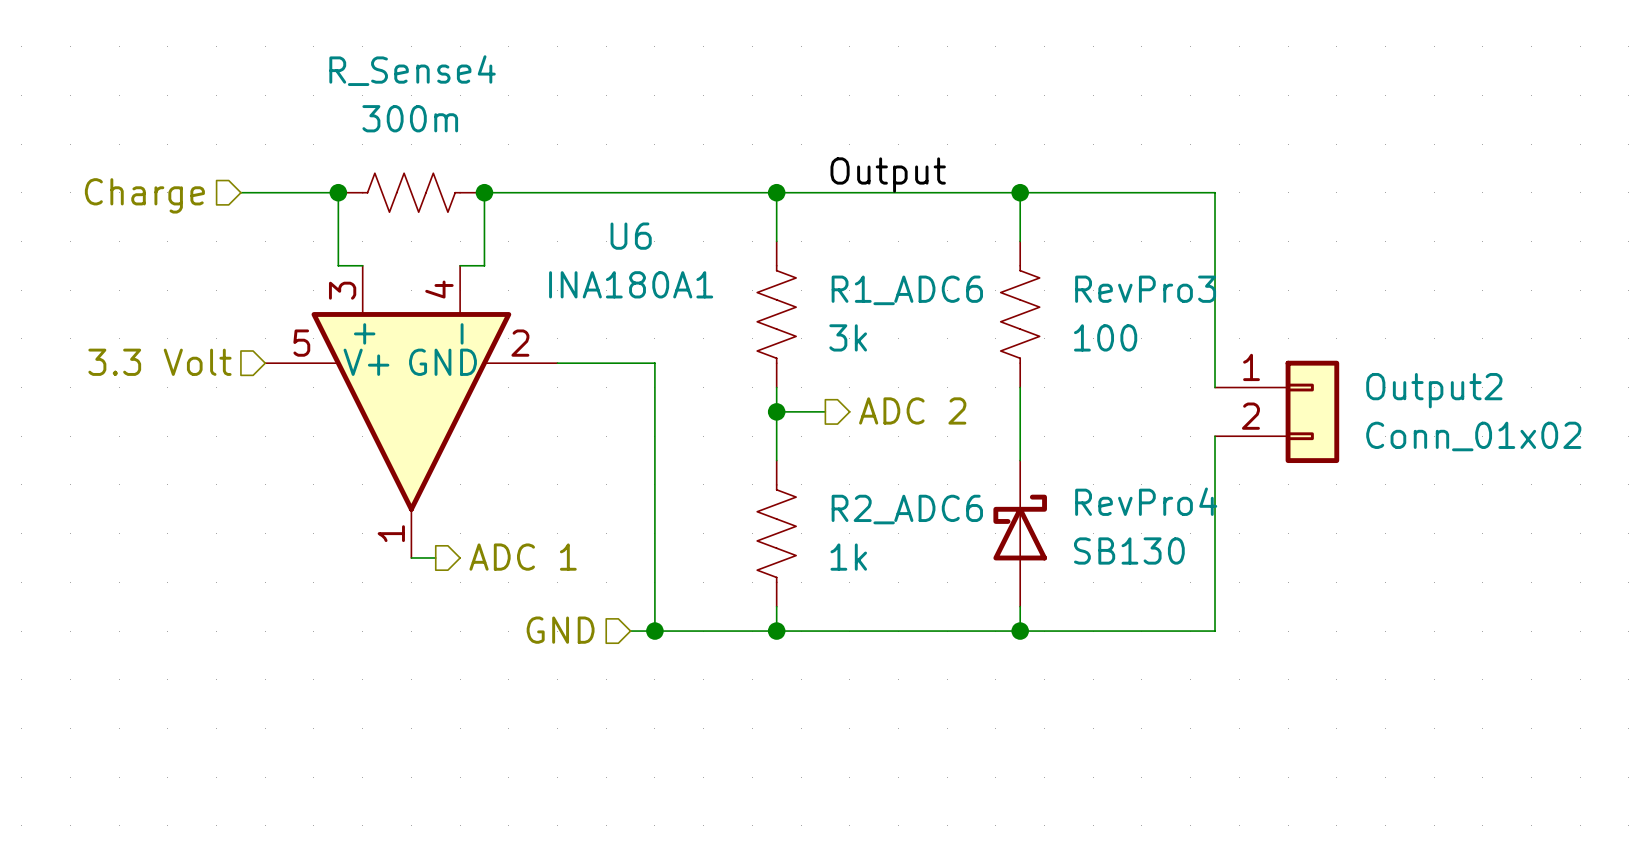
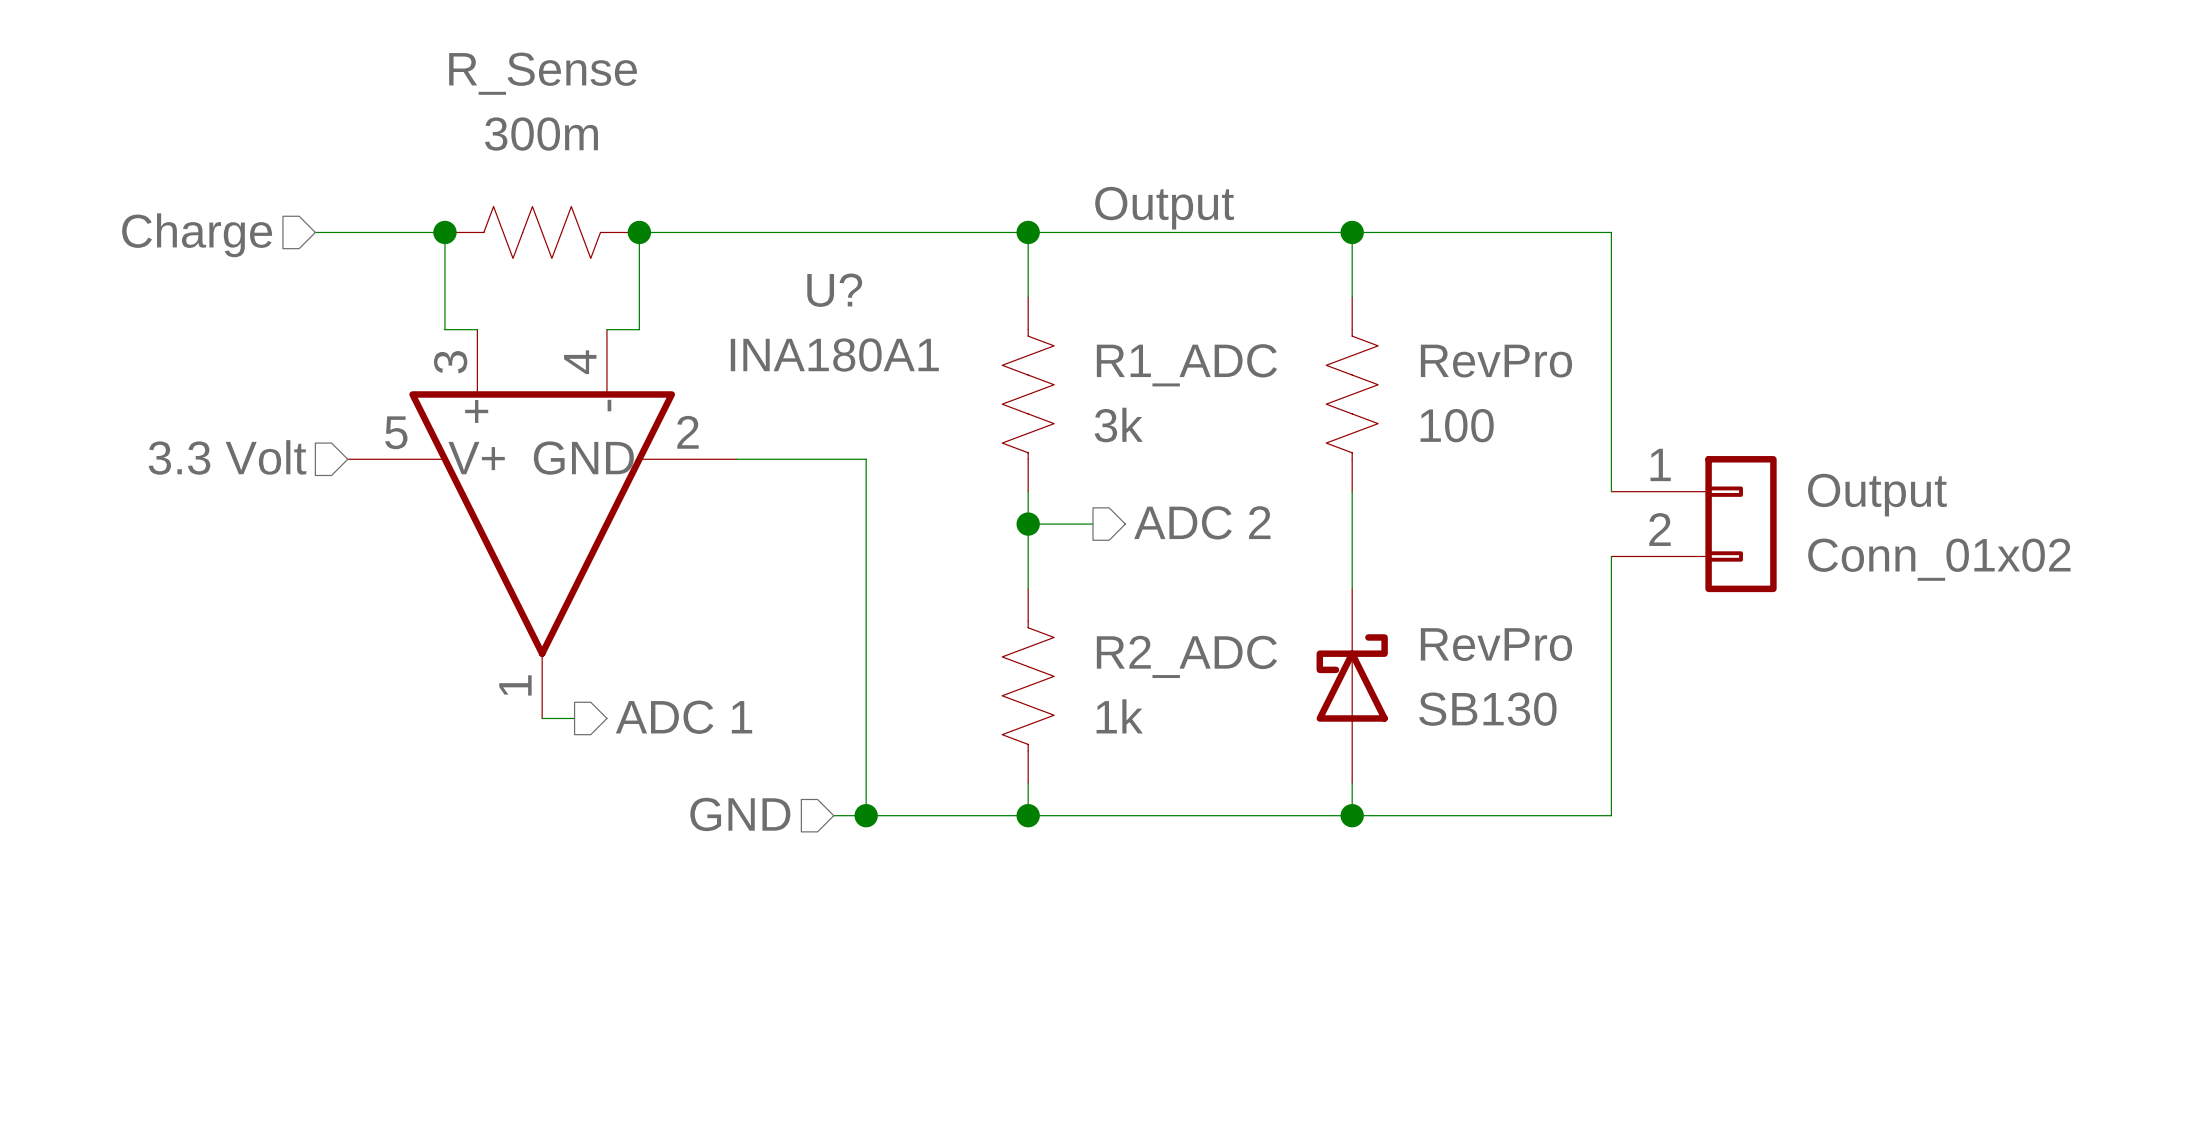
R_Sense4 name: R_Sense4 (412, 70) -> R_Sense (543, 73)
U6 name: U6 (631, 236) -> U? (834, 290)
RevPro3 name: RevPro3 (1145, 289) -> RevPro (1496, 361)
R1_ADC6 name: R1_ADC6 (907, 290) -> R1_ADC (1186, 365)
Output2 name: Output2 (1434, 390) -> Output (1877, 495)
RevPro4 name: RevPro4 (1146, 501) -> RevPro (1496, 644)
R2_ADC6 name: R2_ADC6 (907, 509) -> R2_ADC (1186, 656)

